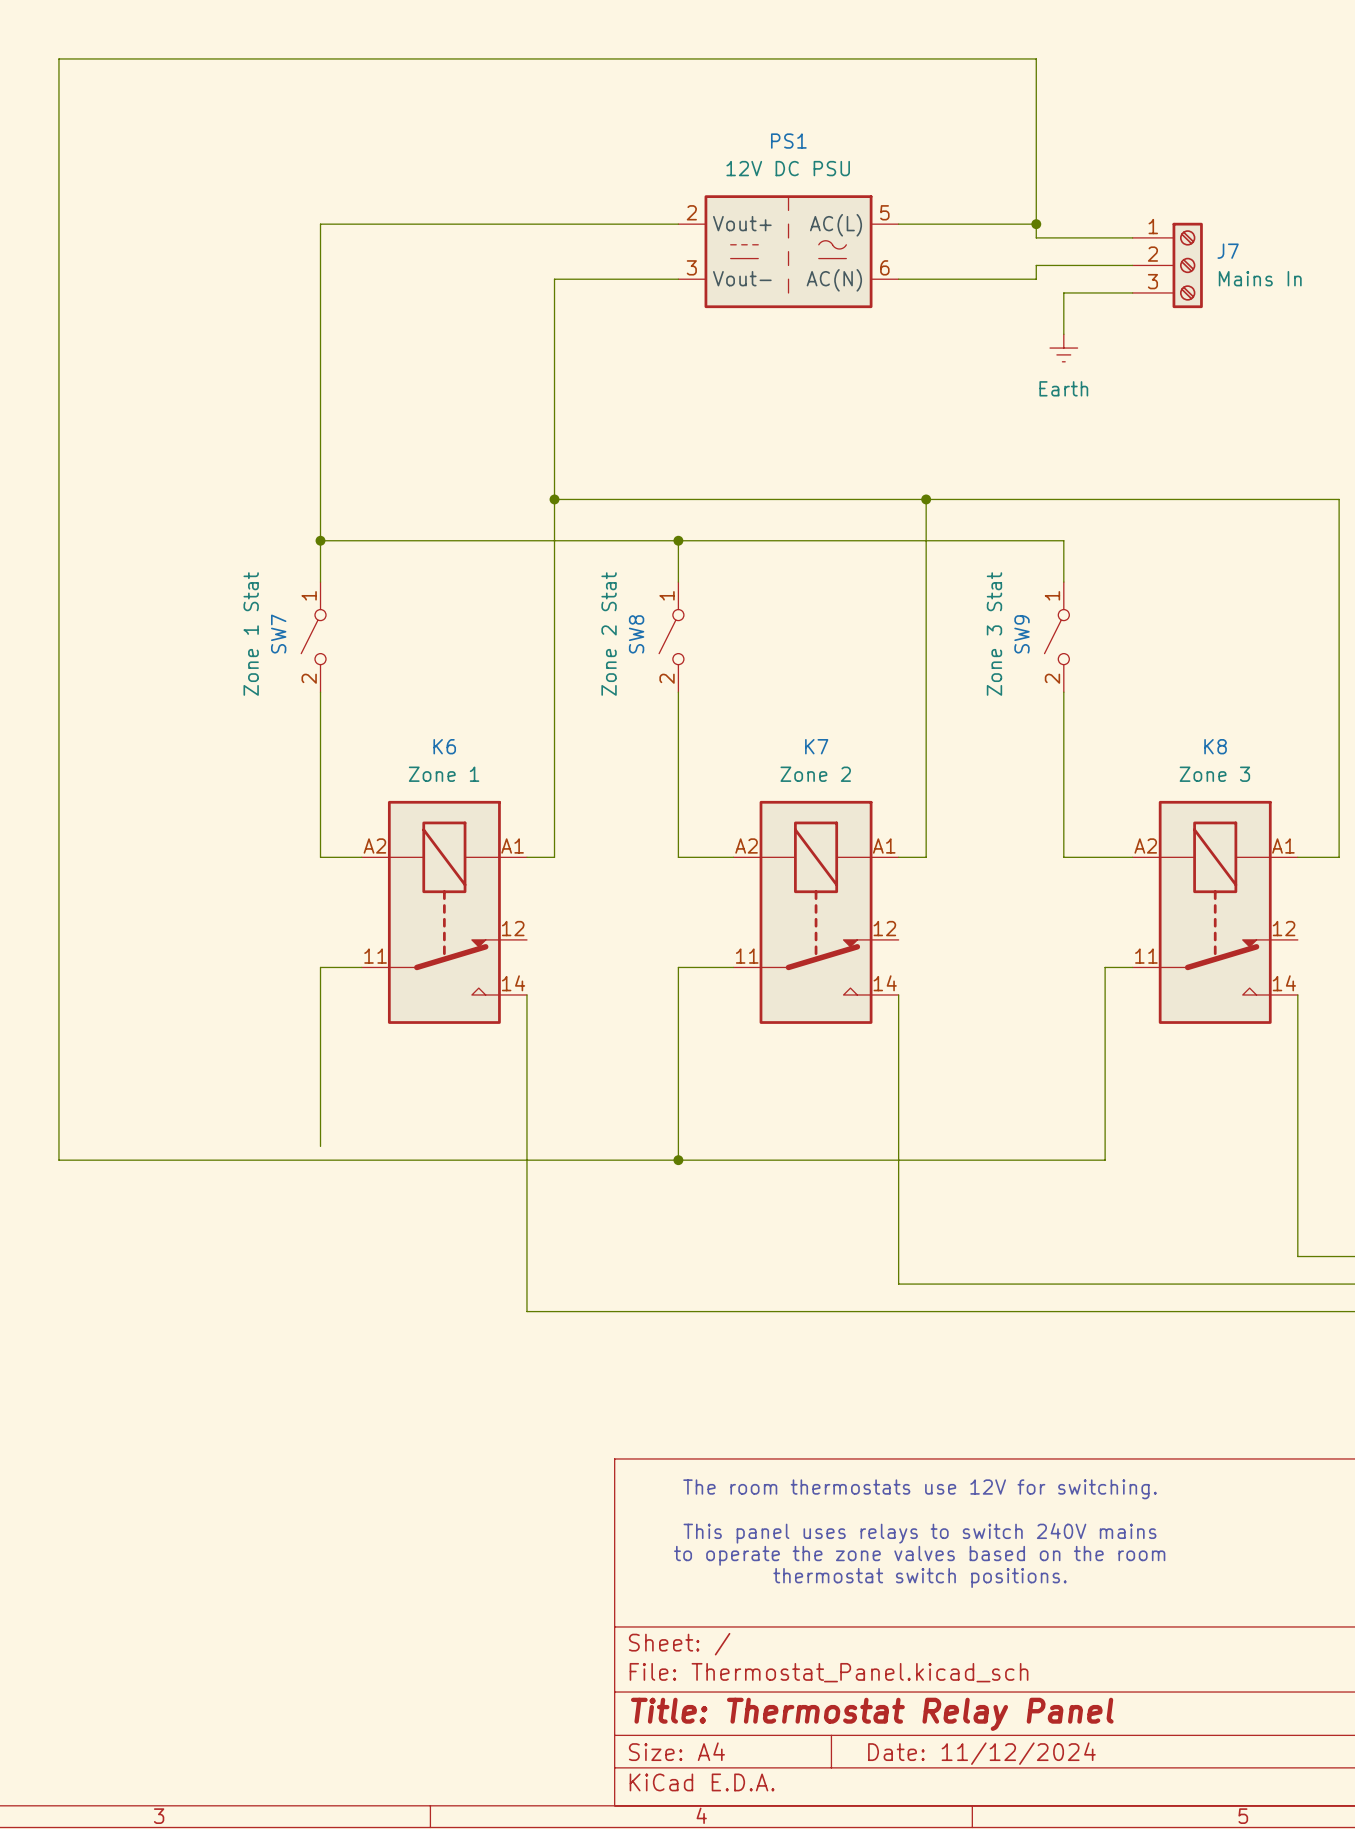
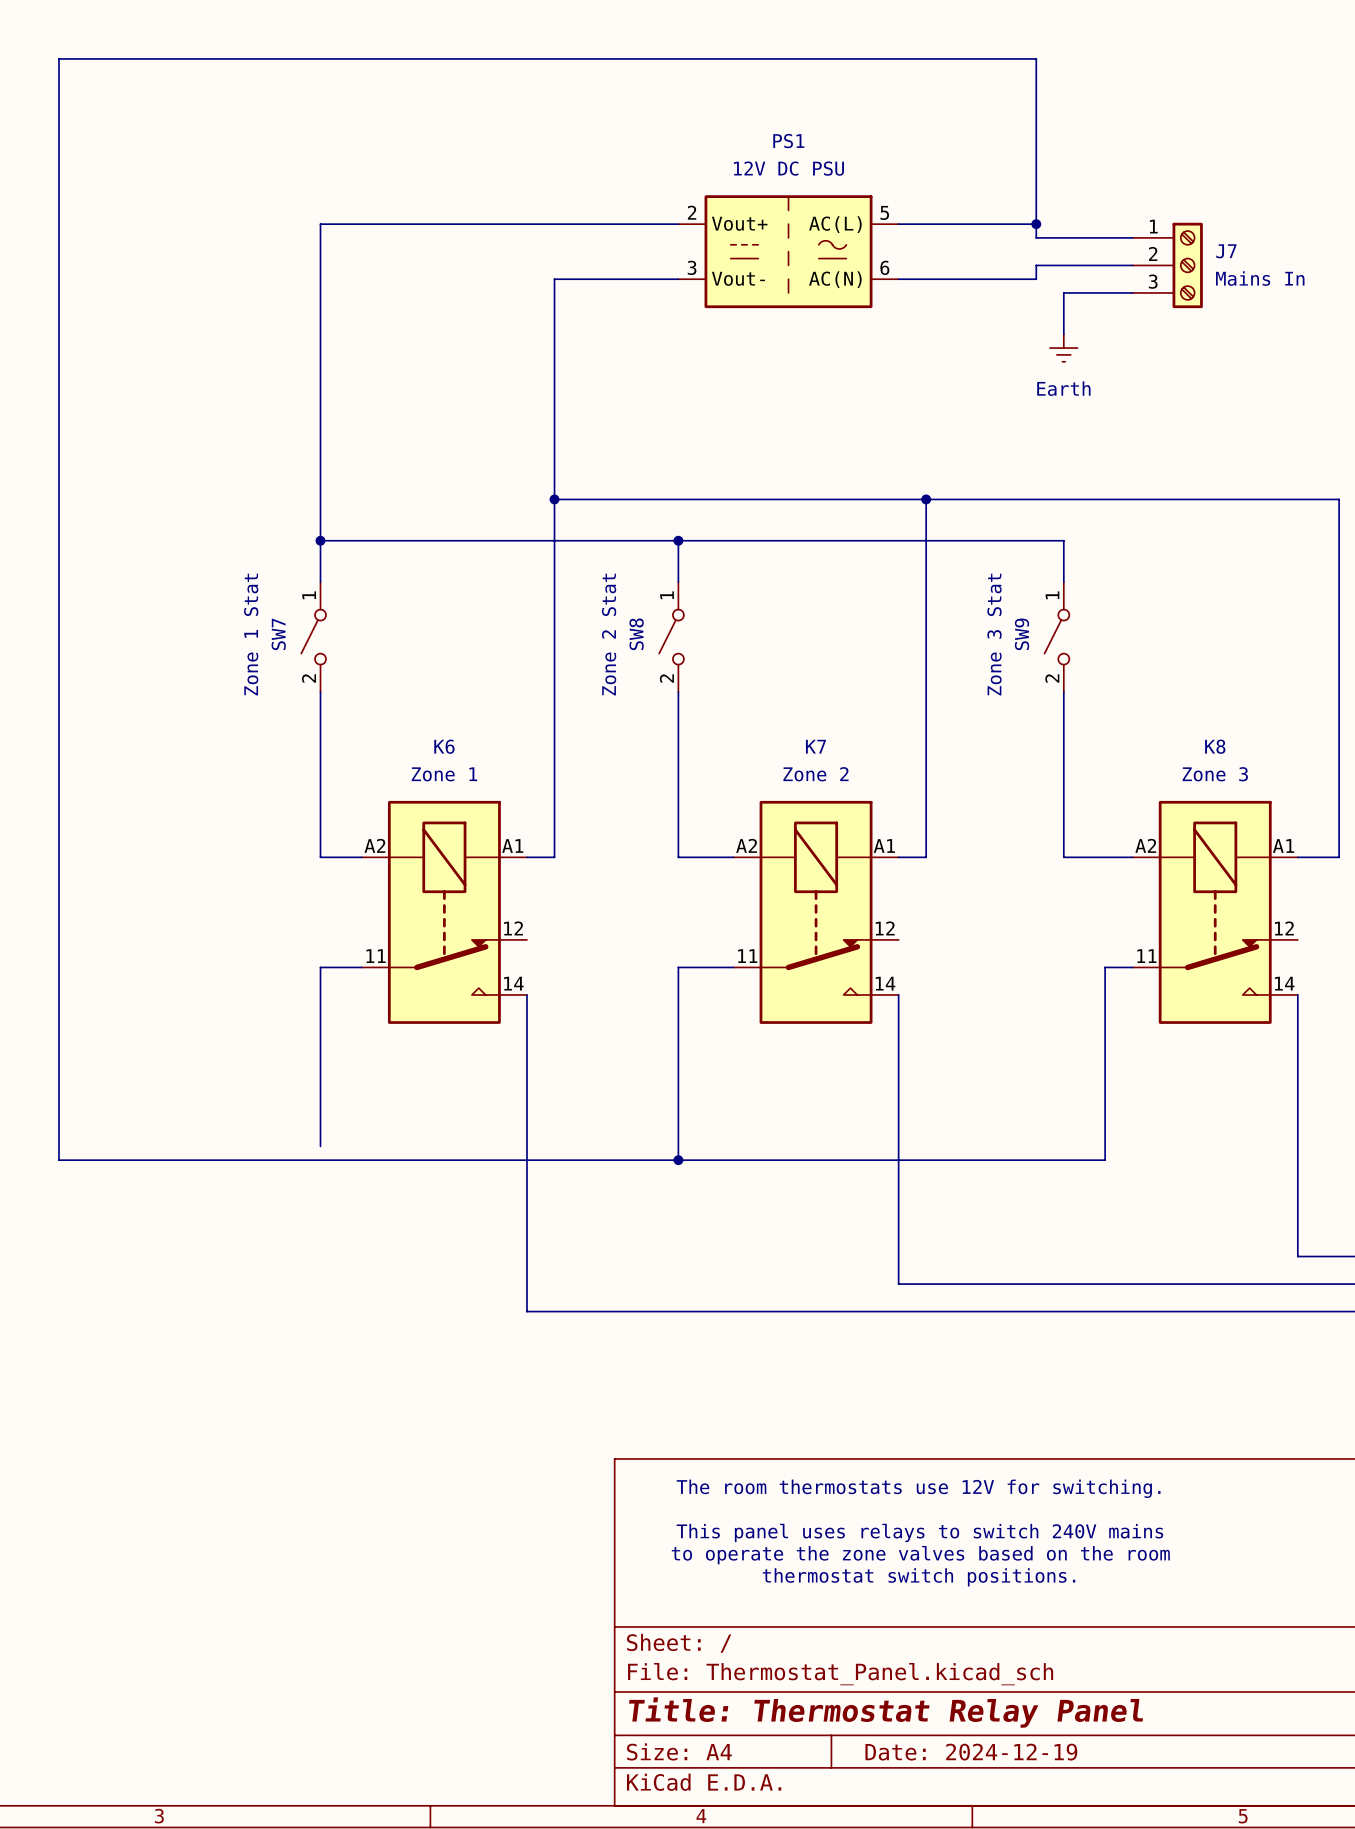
title block: Date: 11/12/2024 (981, 1753) -> Date: 2024-12-19 (971, 1752)

